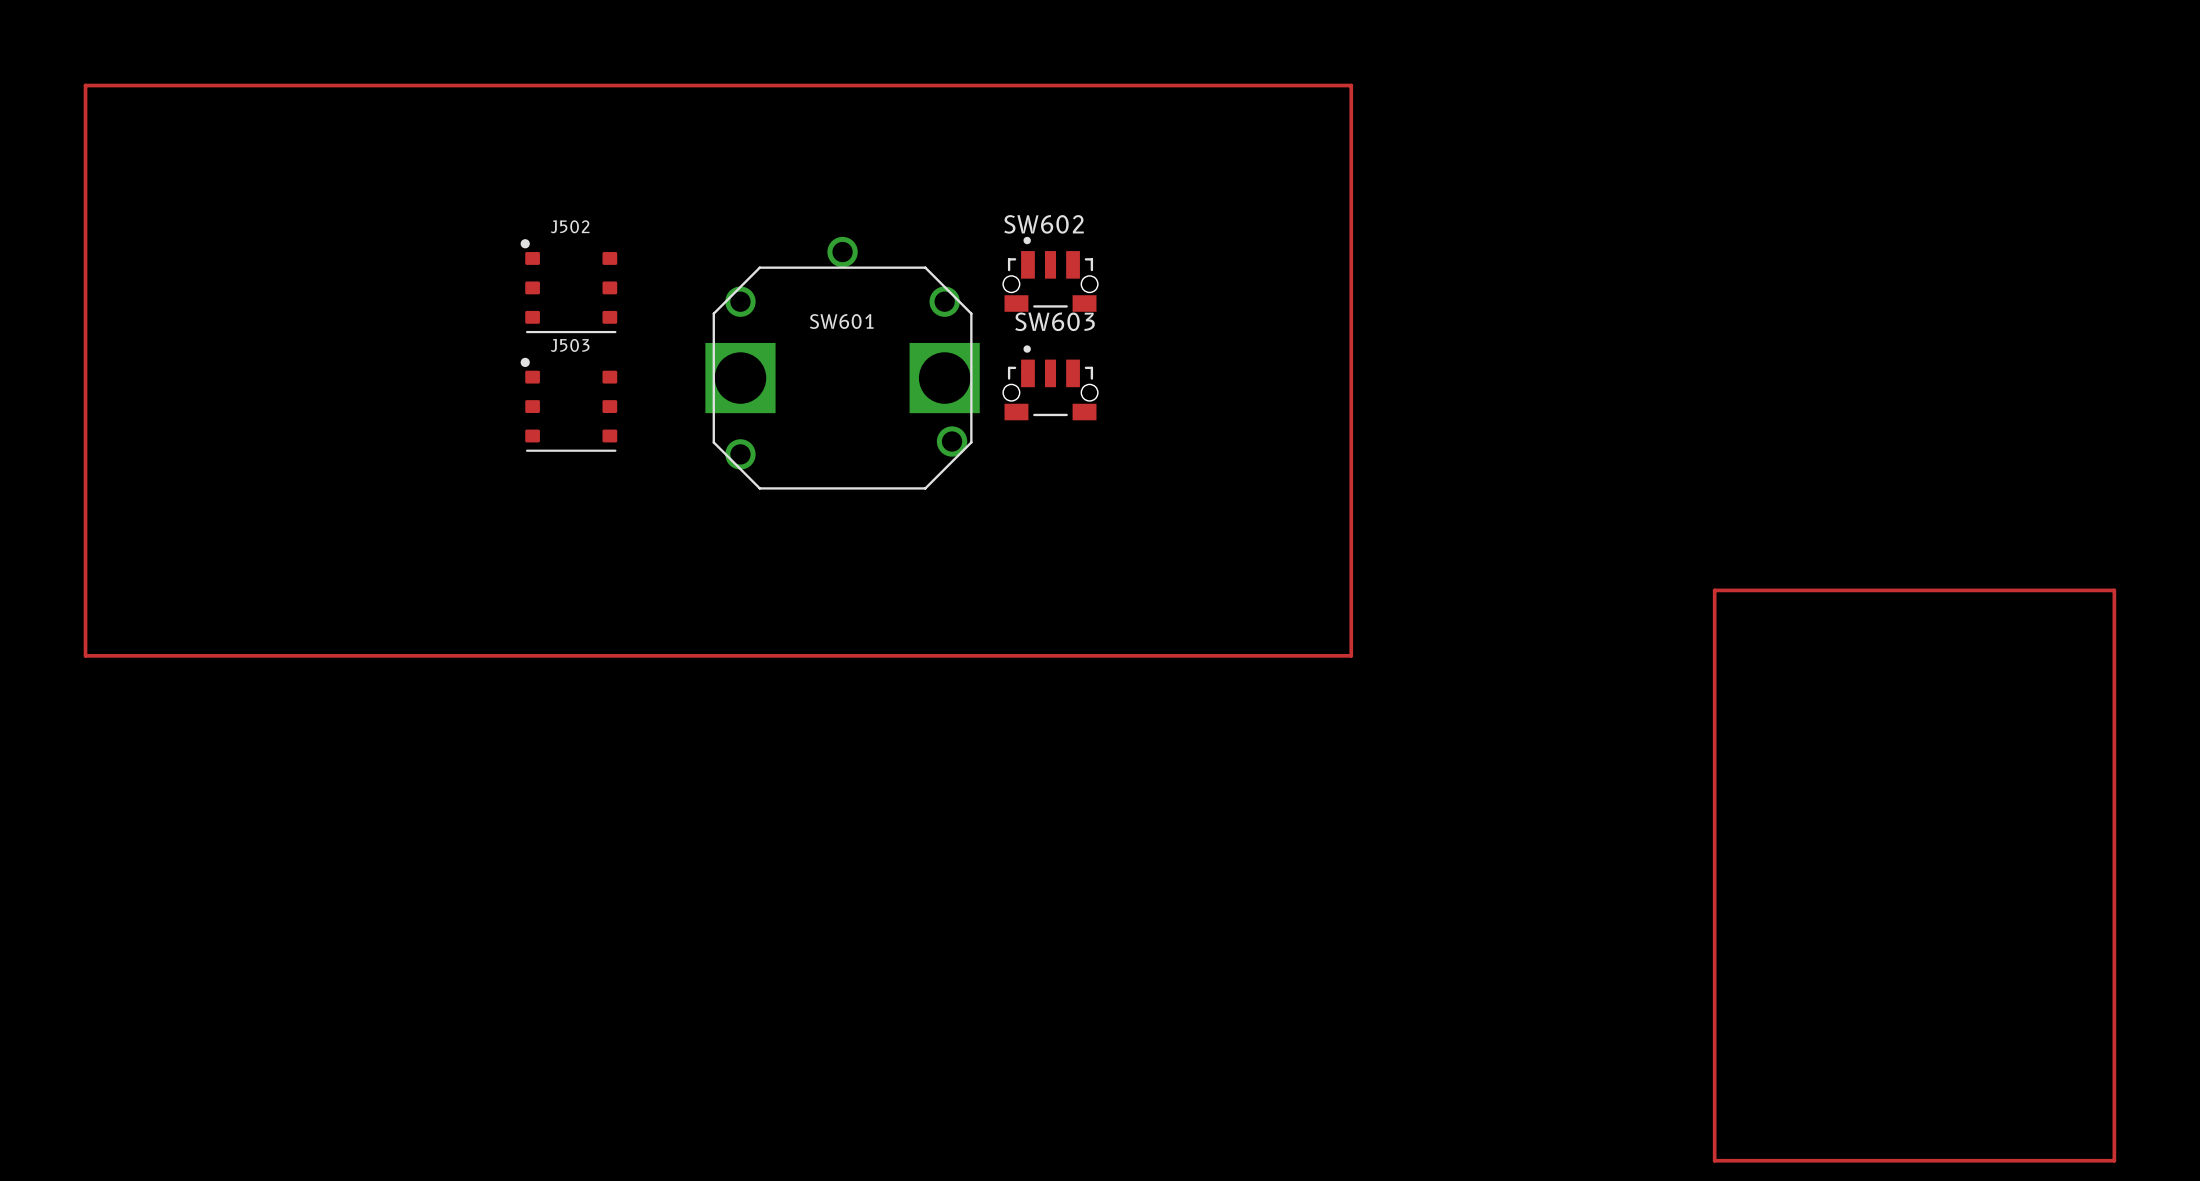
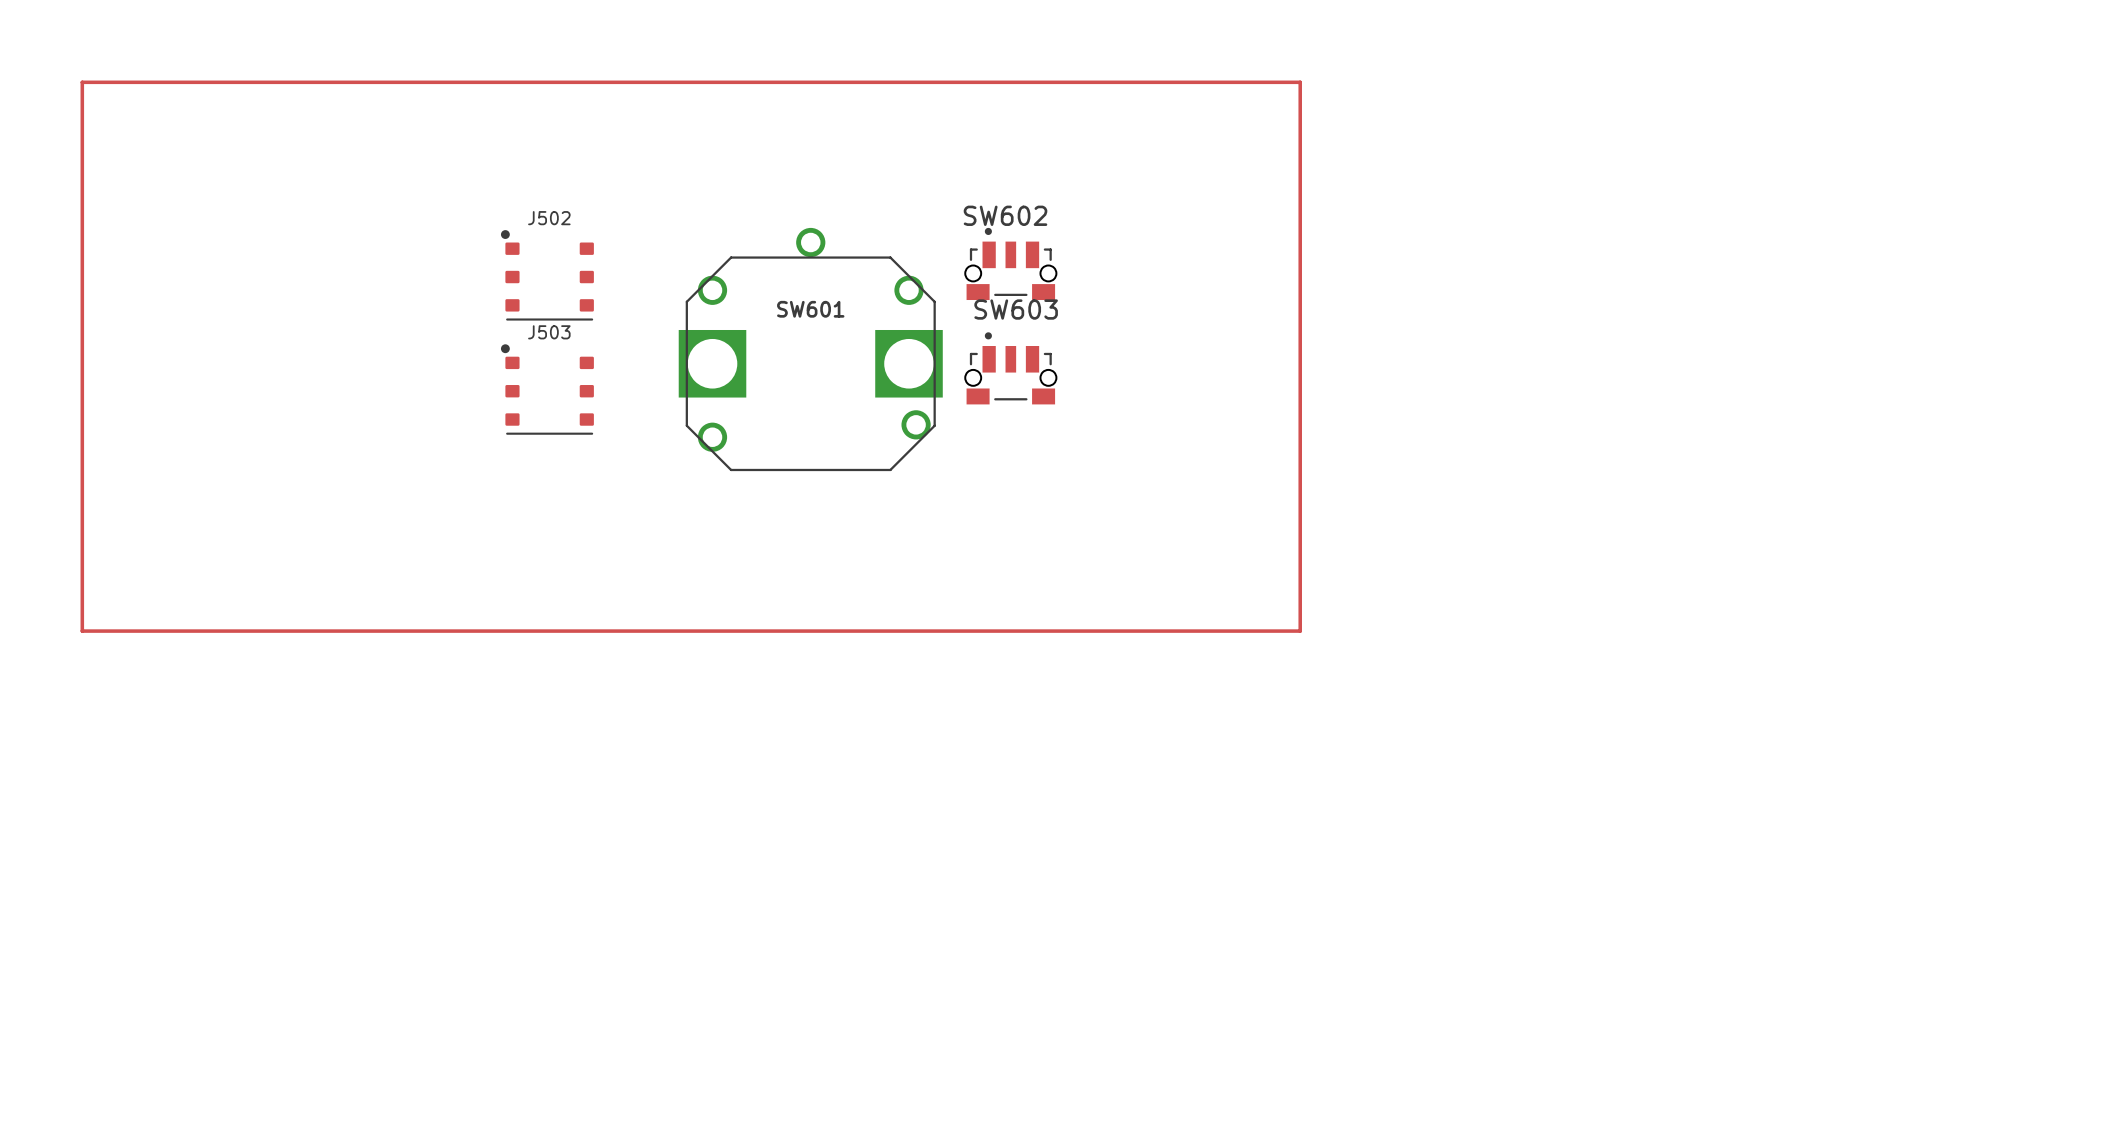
top track: (1714, 590) (2114, 590) (2114, 1160) (1714, 1160) (1714, 590) -> none

